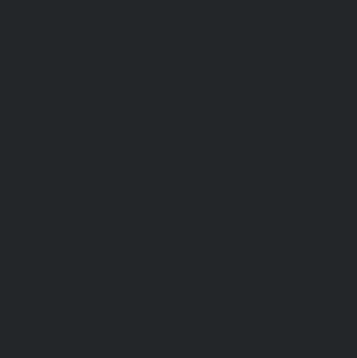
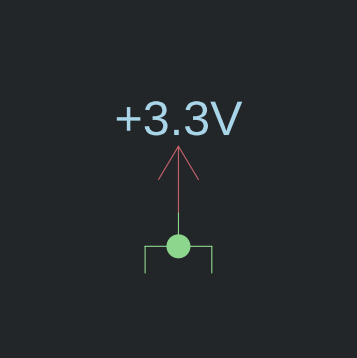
power symbol: none -> +3.3V (178, 179)
wire: none -> (178, 212) (178, 246)
junction: none -> (178, 246)
wire: none -> (145, 272) (145, 246) (211, 246) (211, 272)

